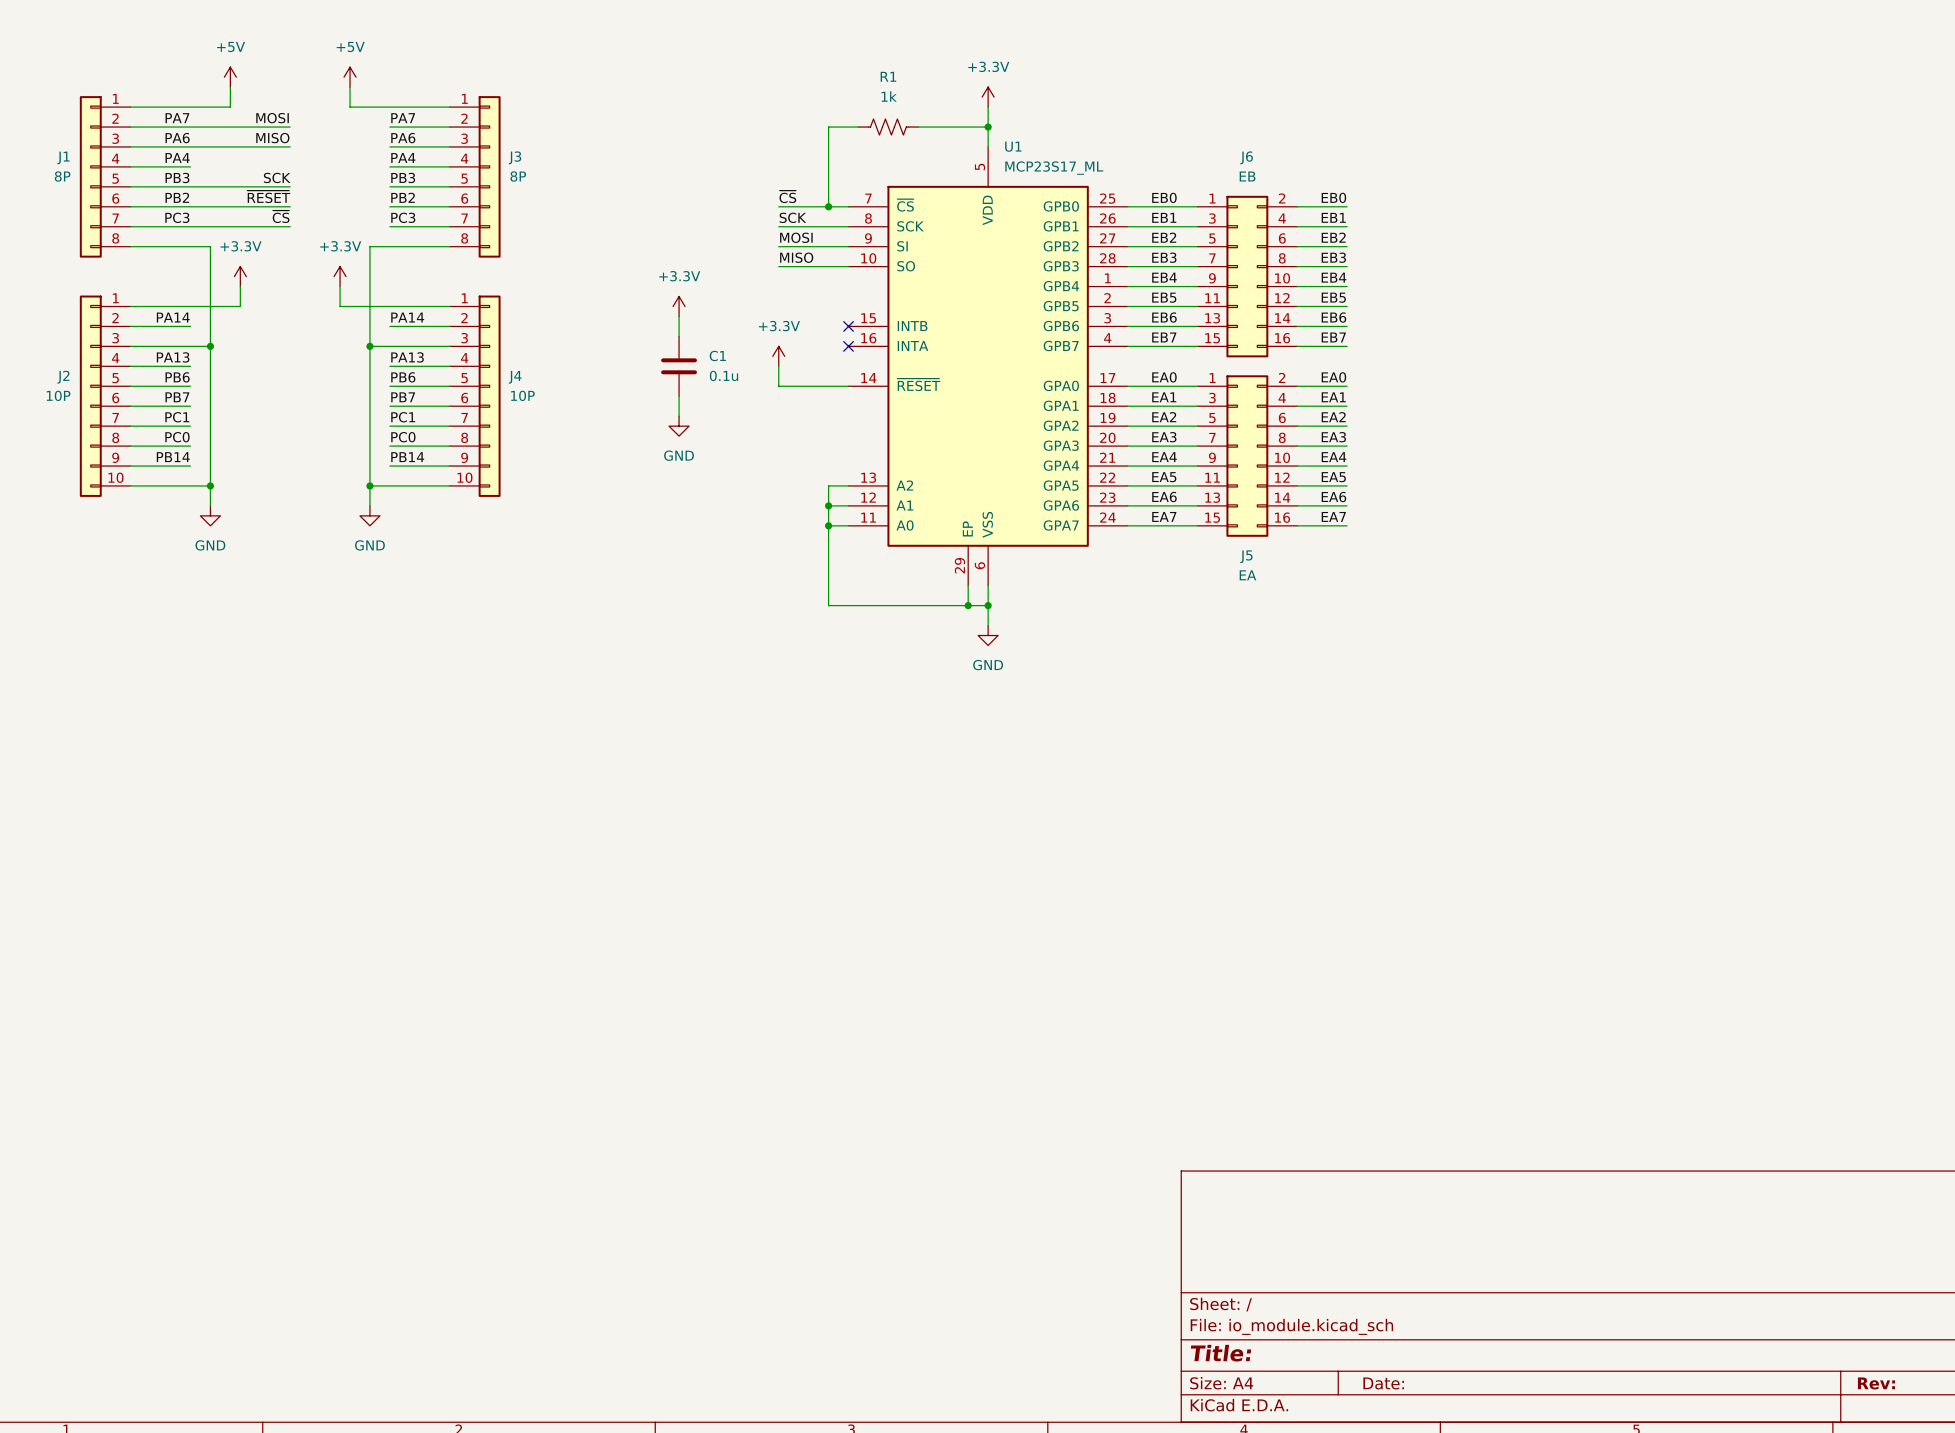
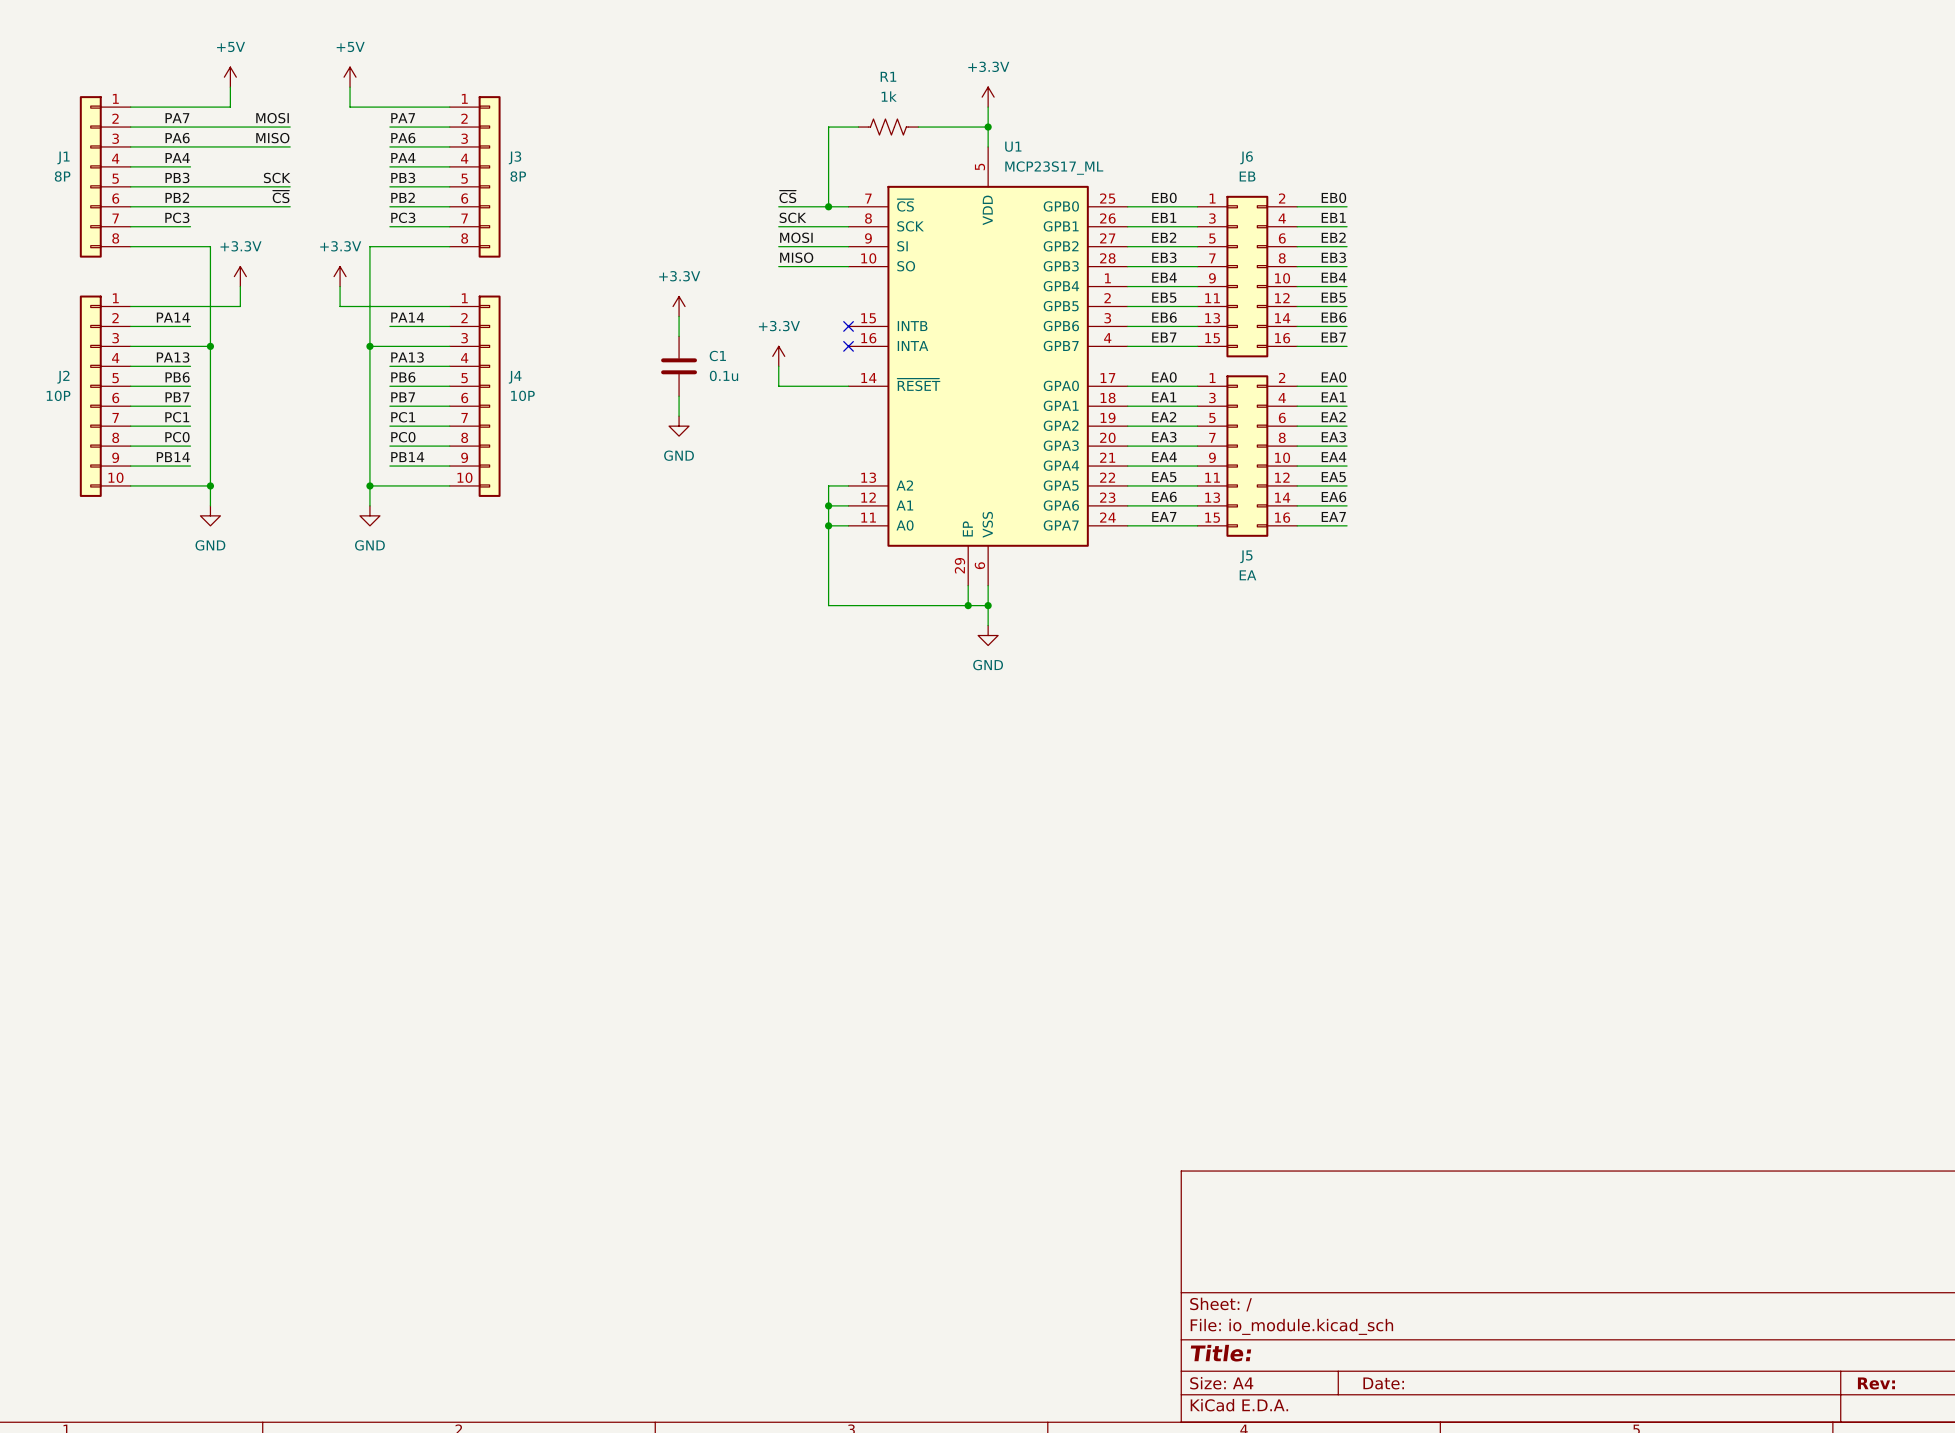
label: ~{RESET} (268, 196) -> ~{CS} (281, 196)
label: ~{CS} (281, 216) -> none
wire: (190, 226) (290, 226) -> none

